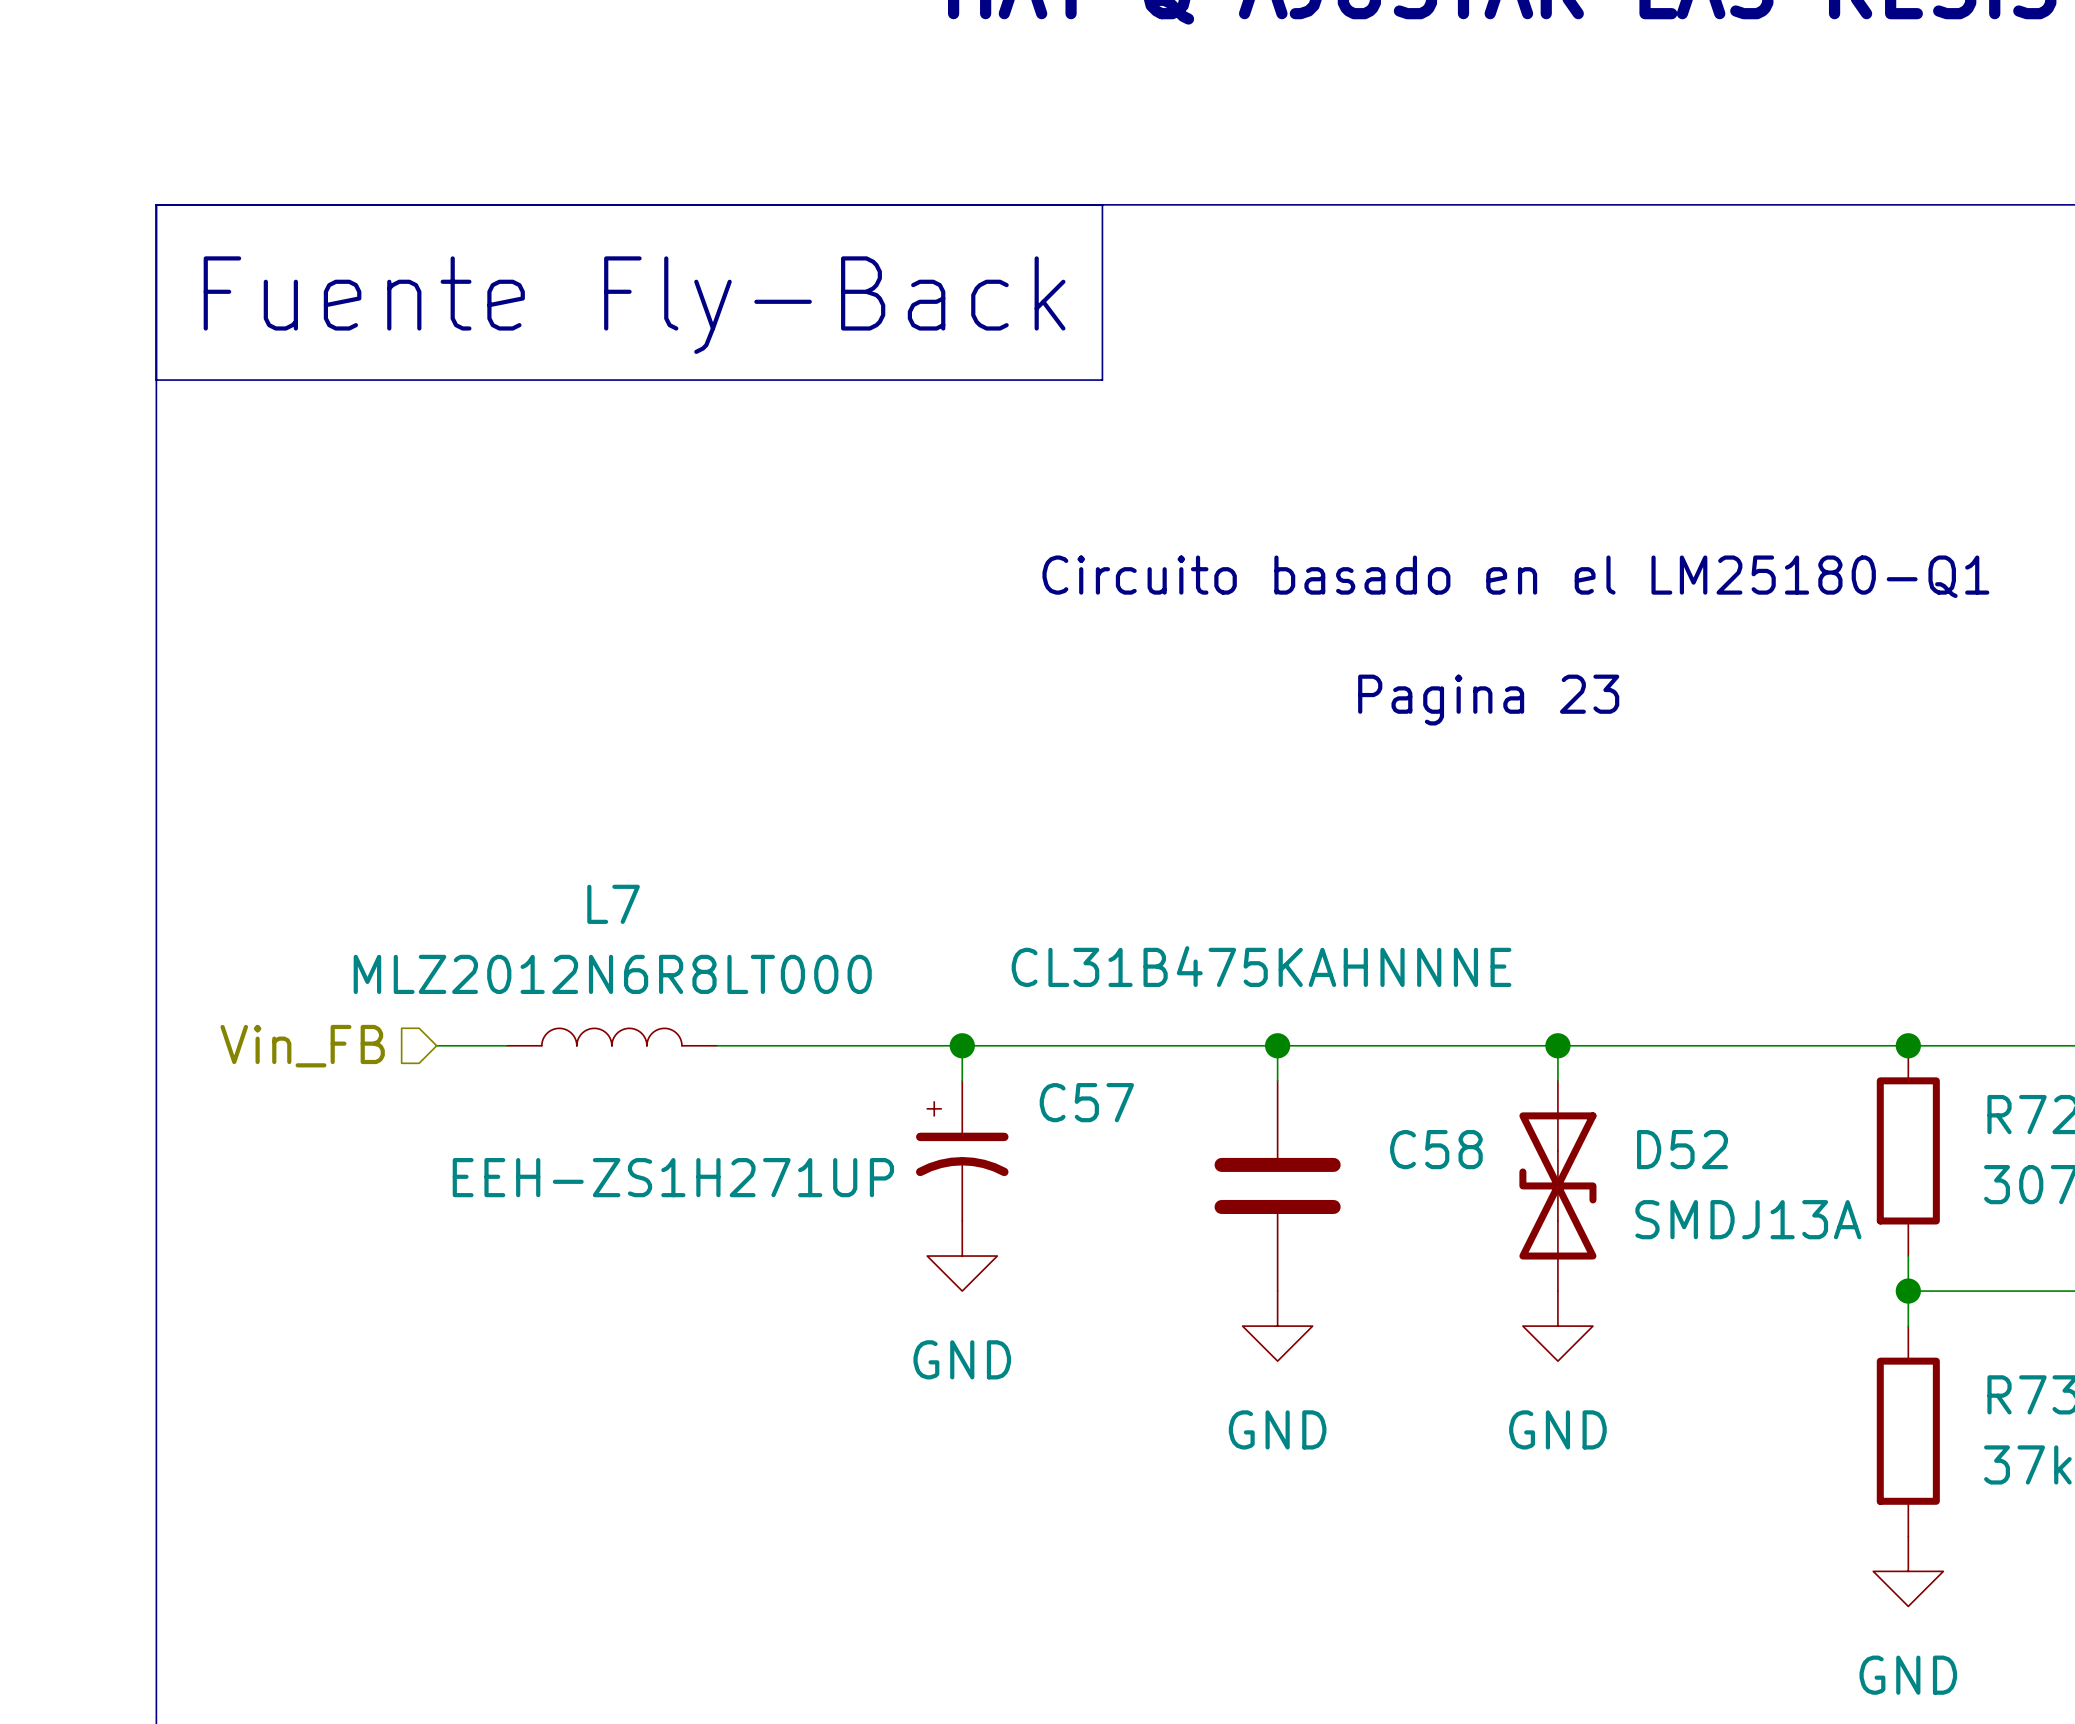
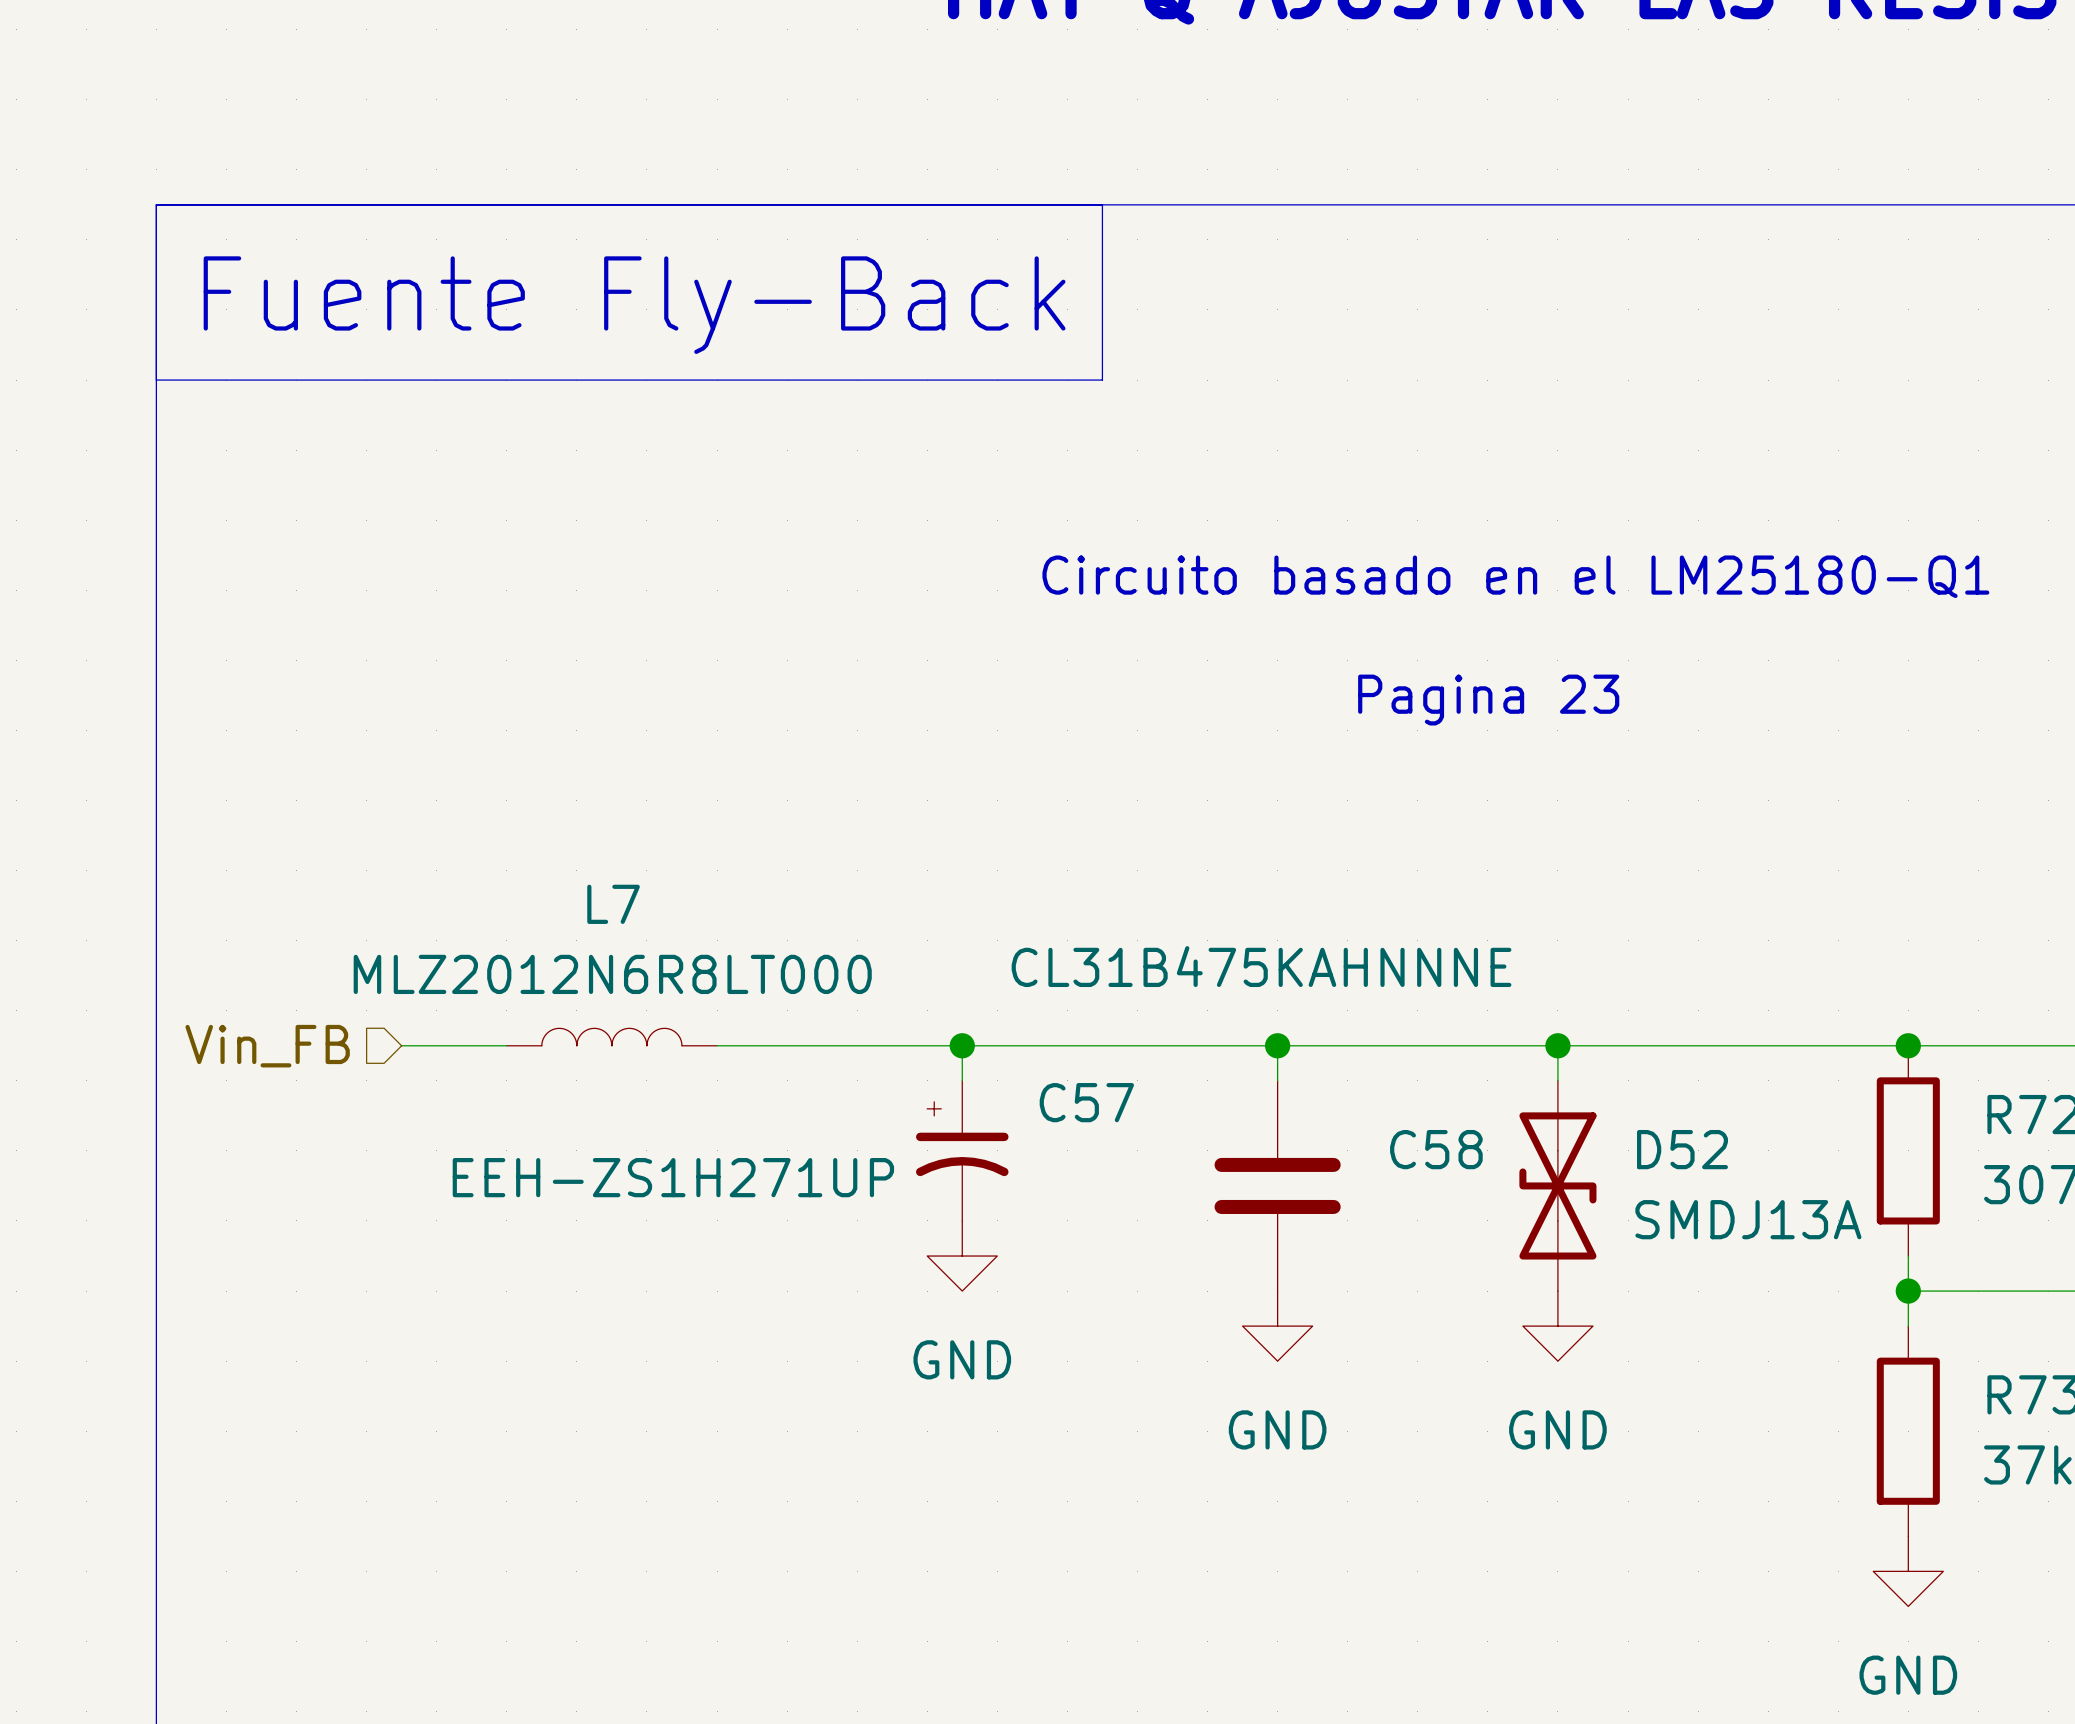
wire: none -> (401, 1045) (436, 1045)
hierarchical label position: Vin_FB (302, 1046) -> Vin_FB (267, 1046)

